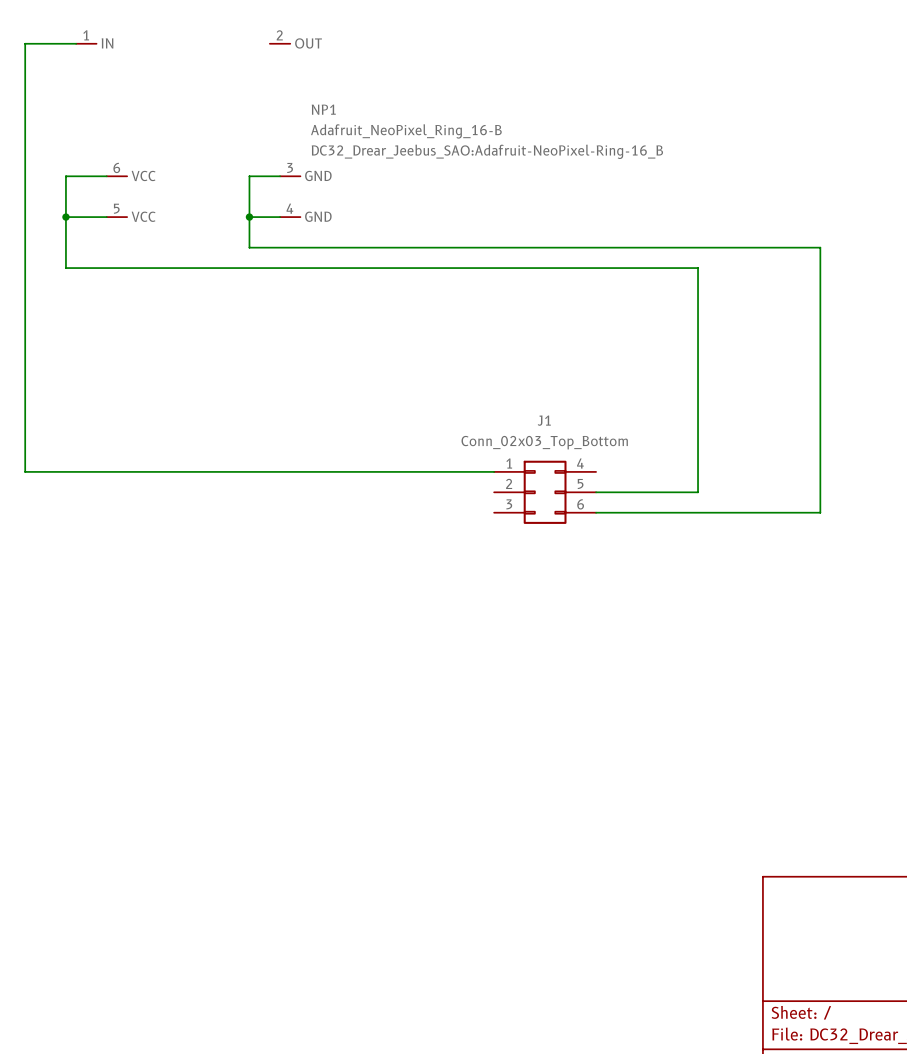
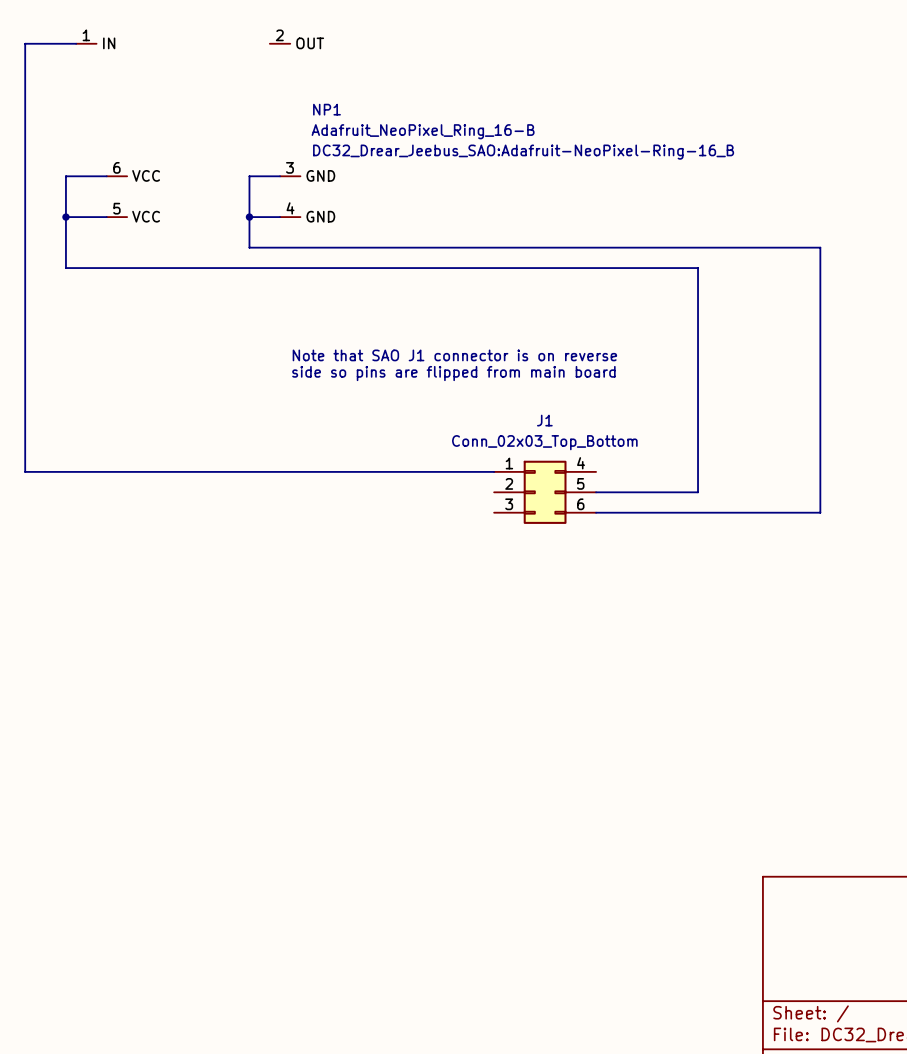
text: none -> Note that SAO J1 connector is on reverse (454, 355)
text: none -> side so pins are flipped from main board (453, 373)

